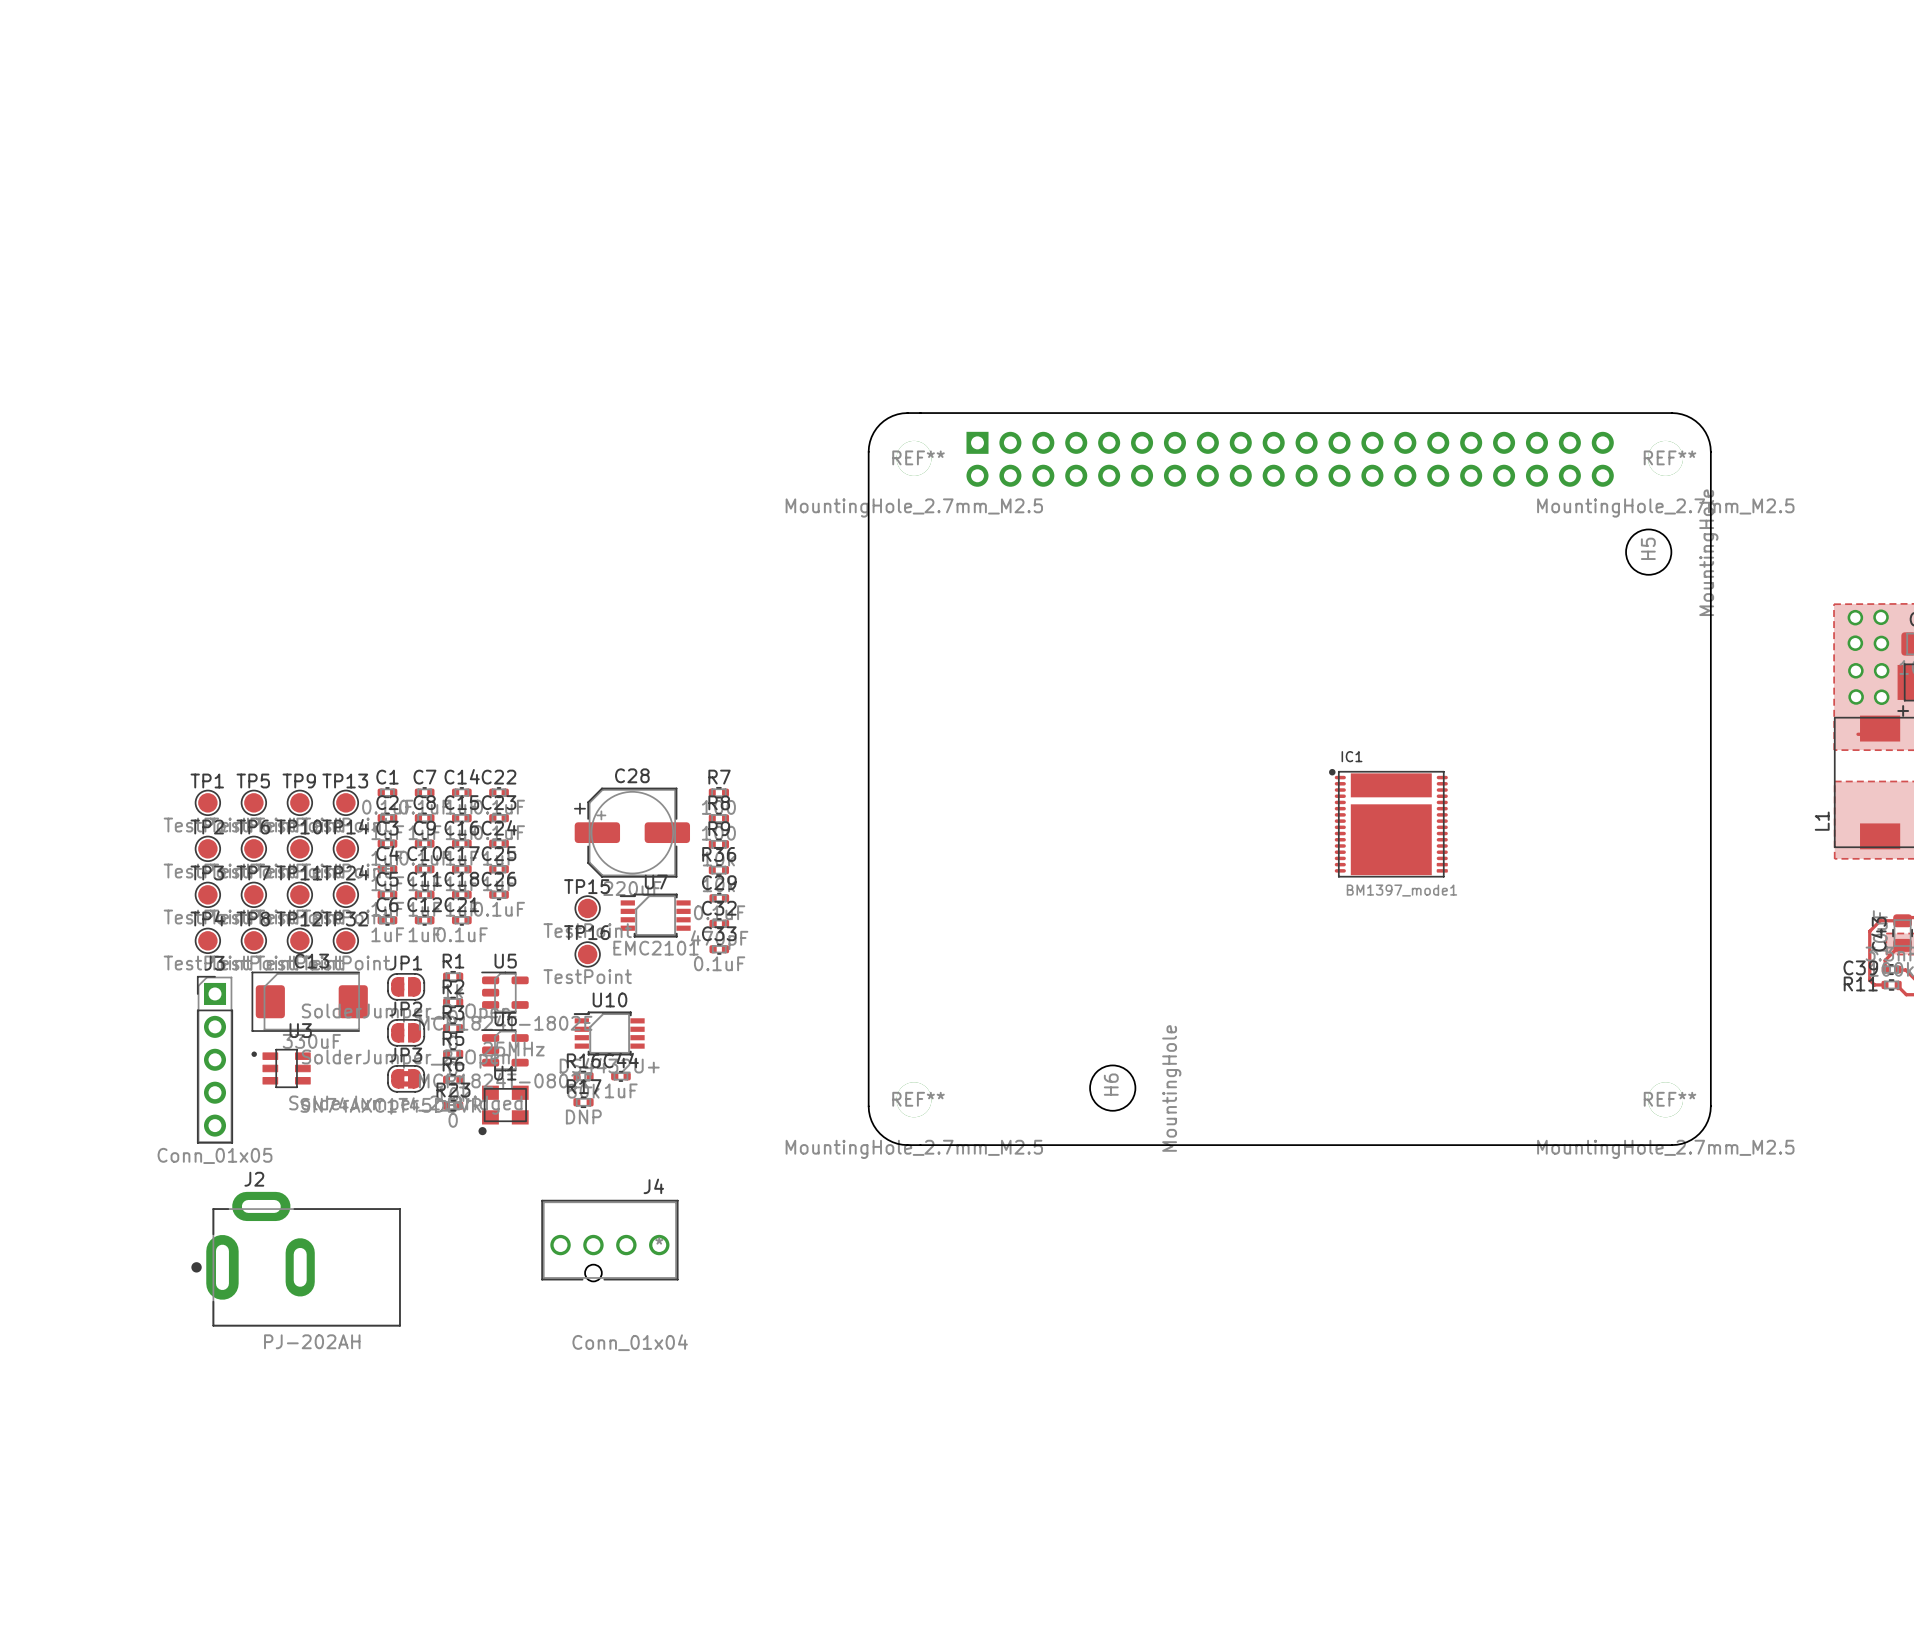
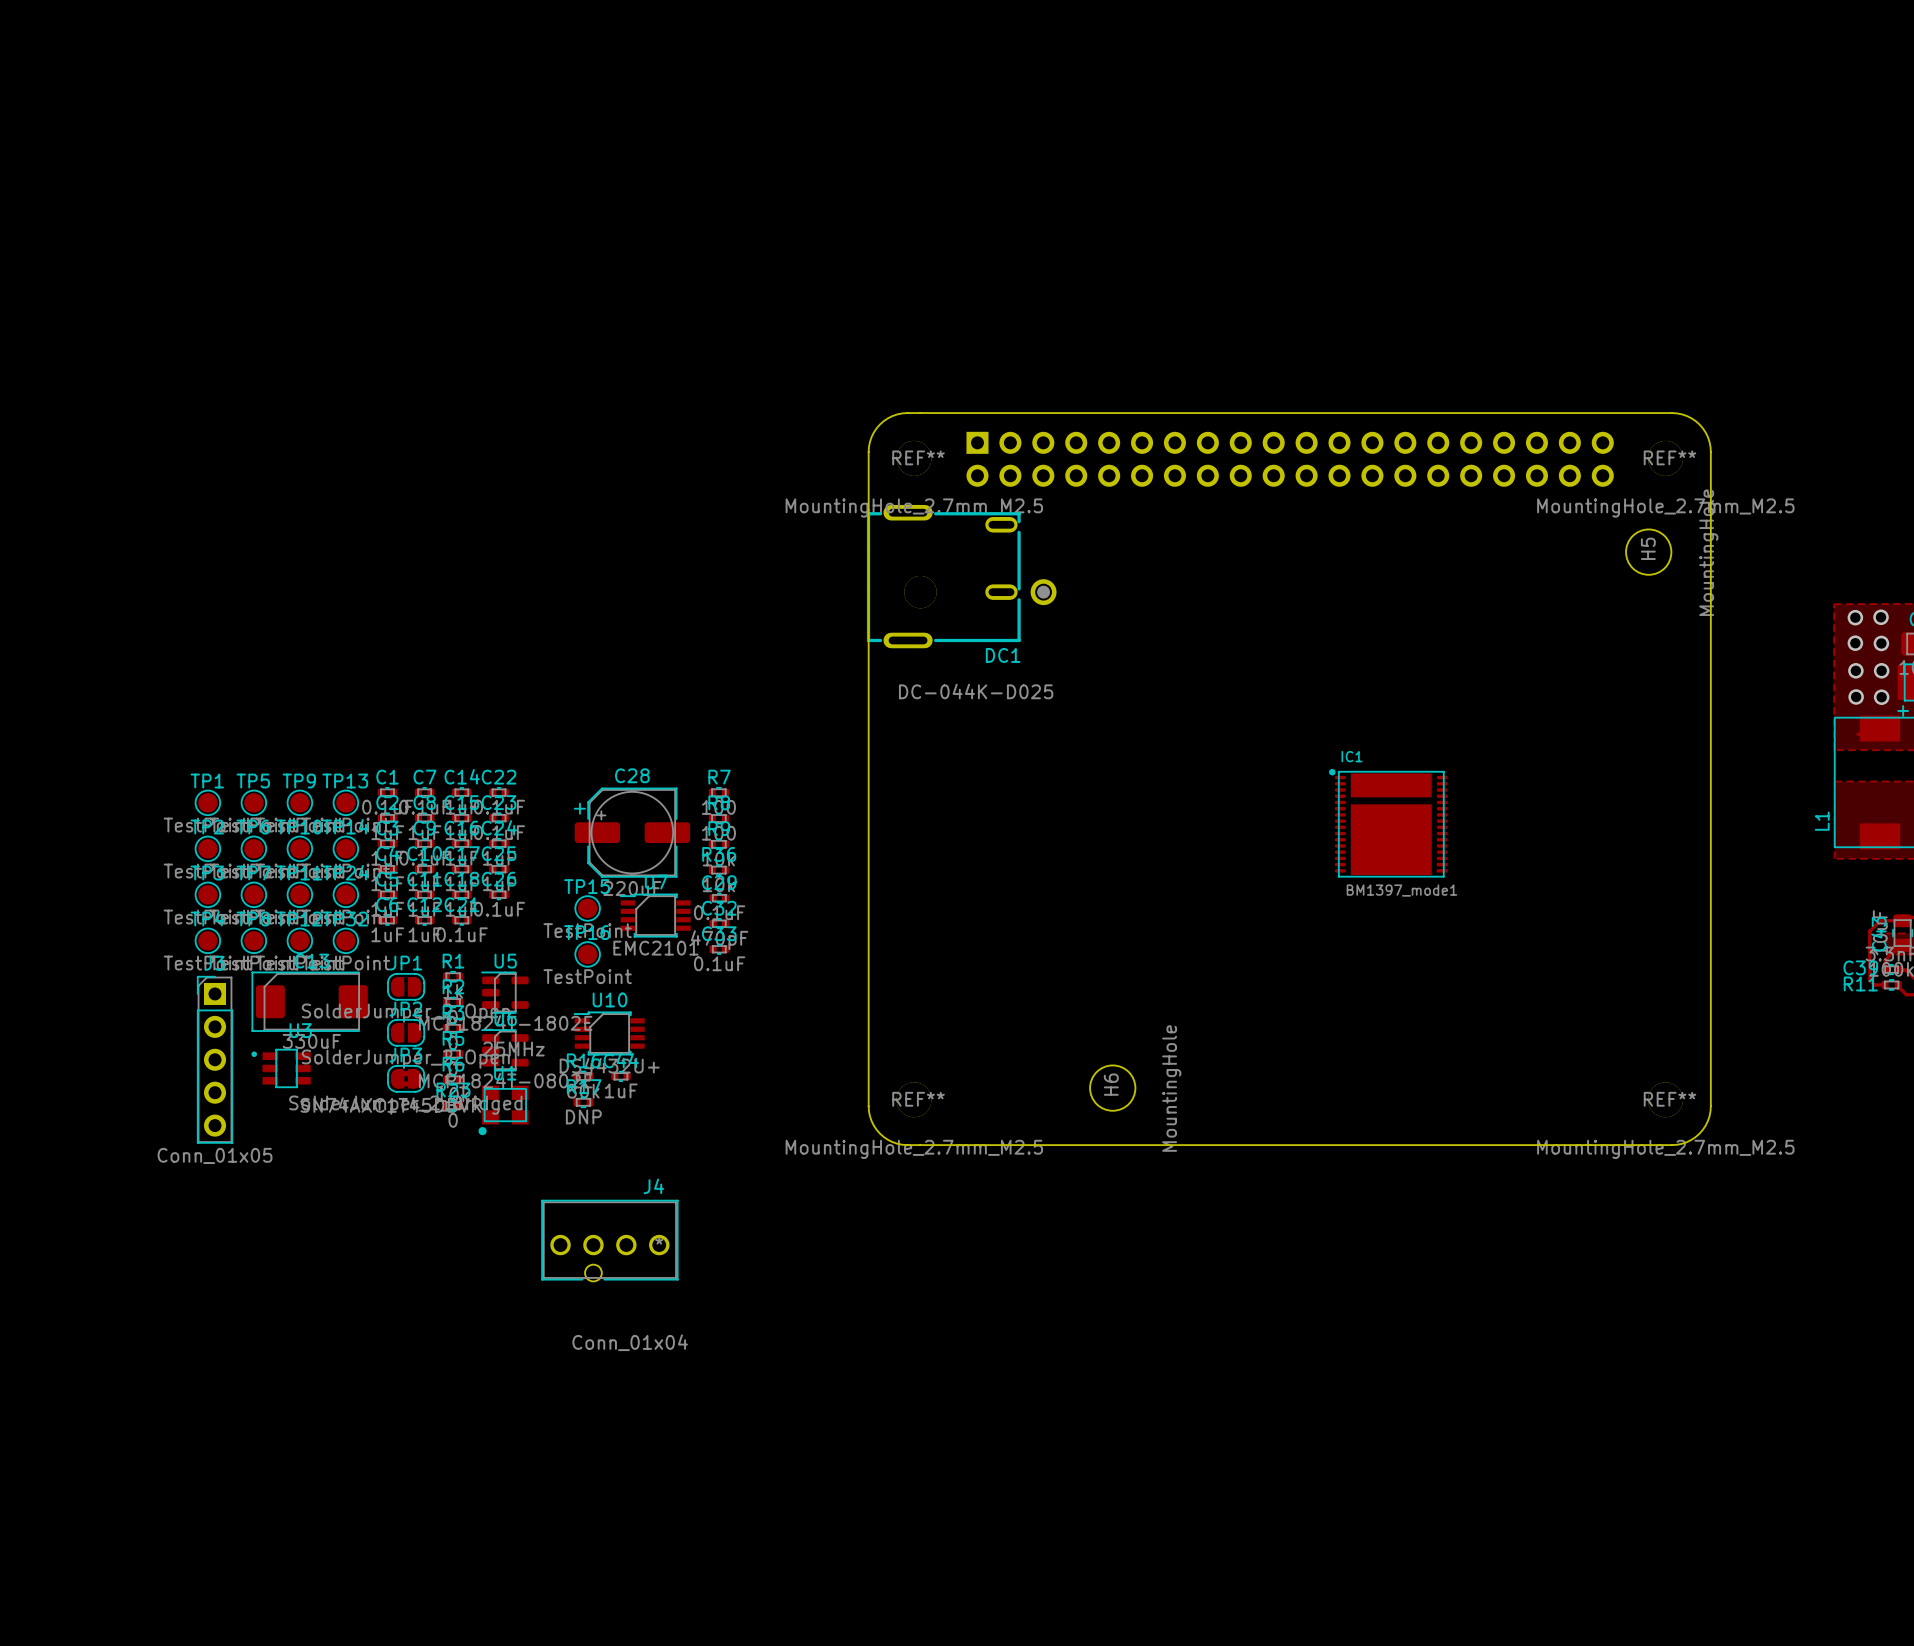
DC1: none -> DC-044K-D025 (961, 576)
J2: PJ-202AH (296, 1259) -> none

